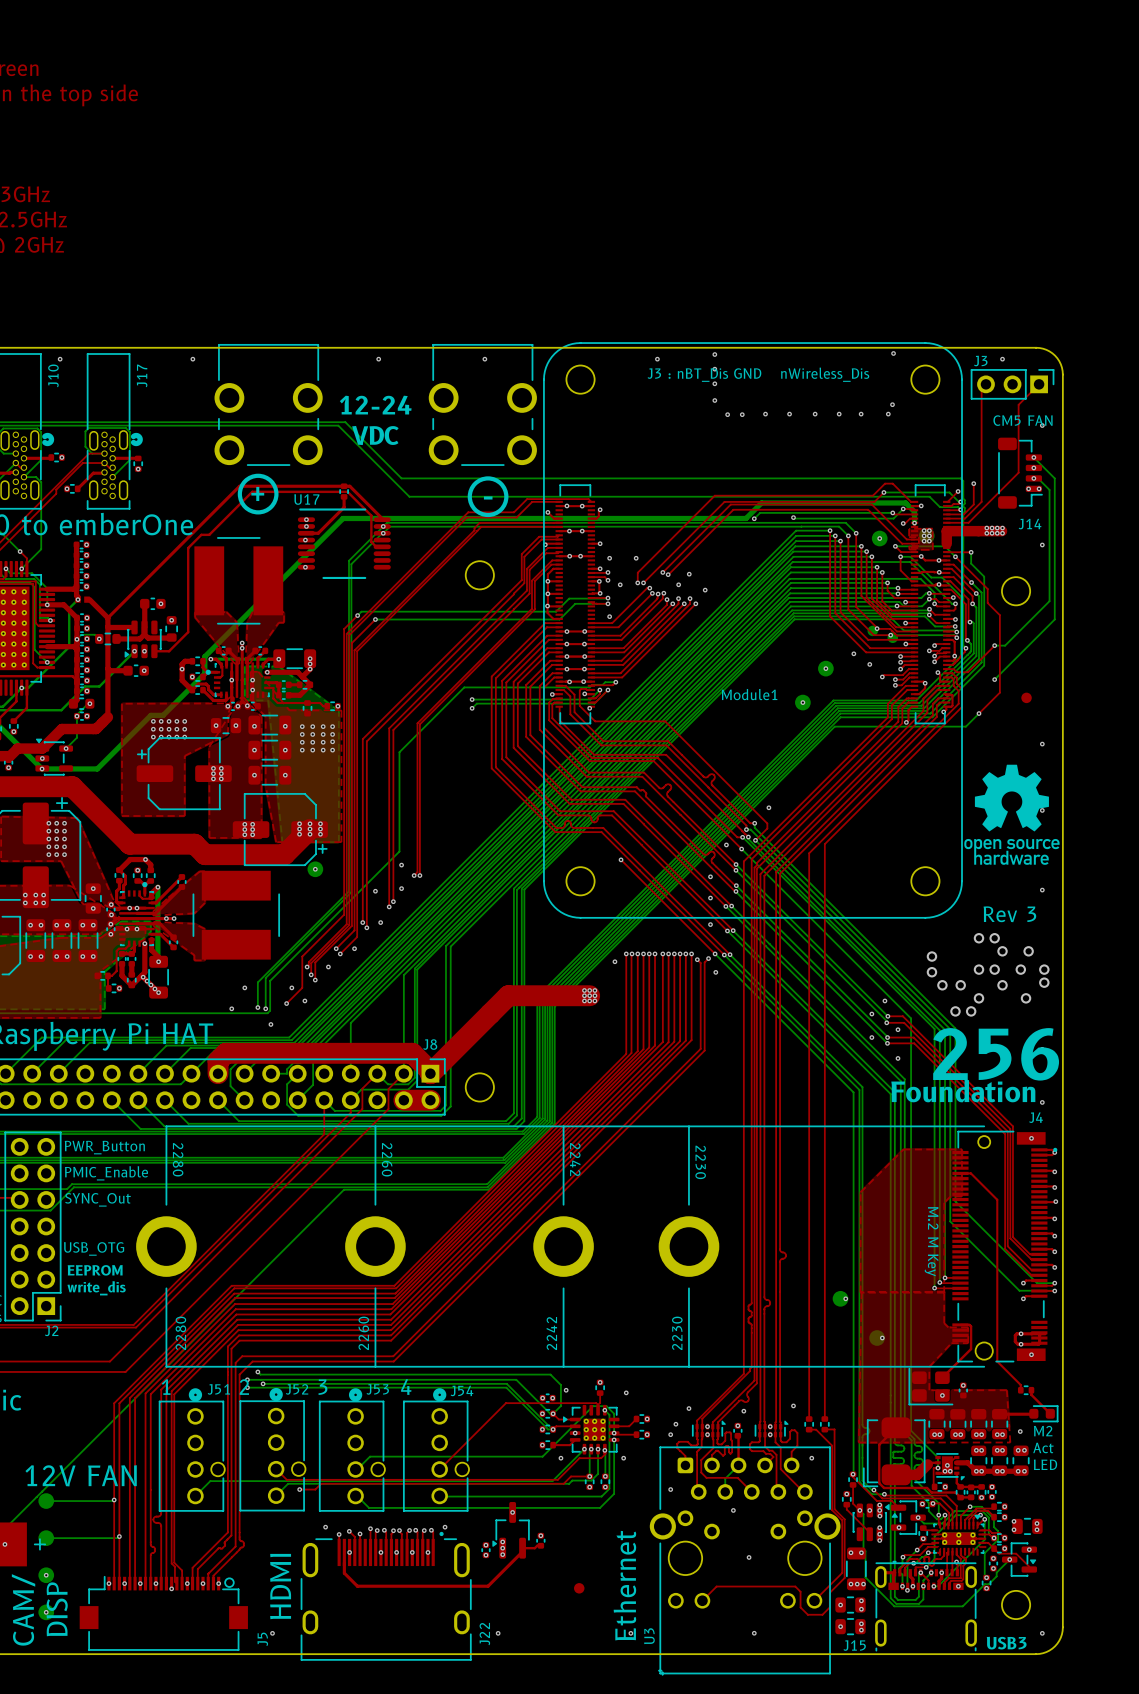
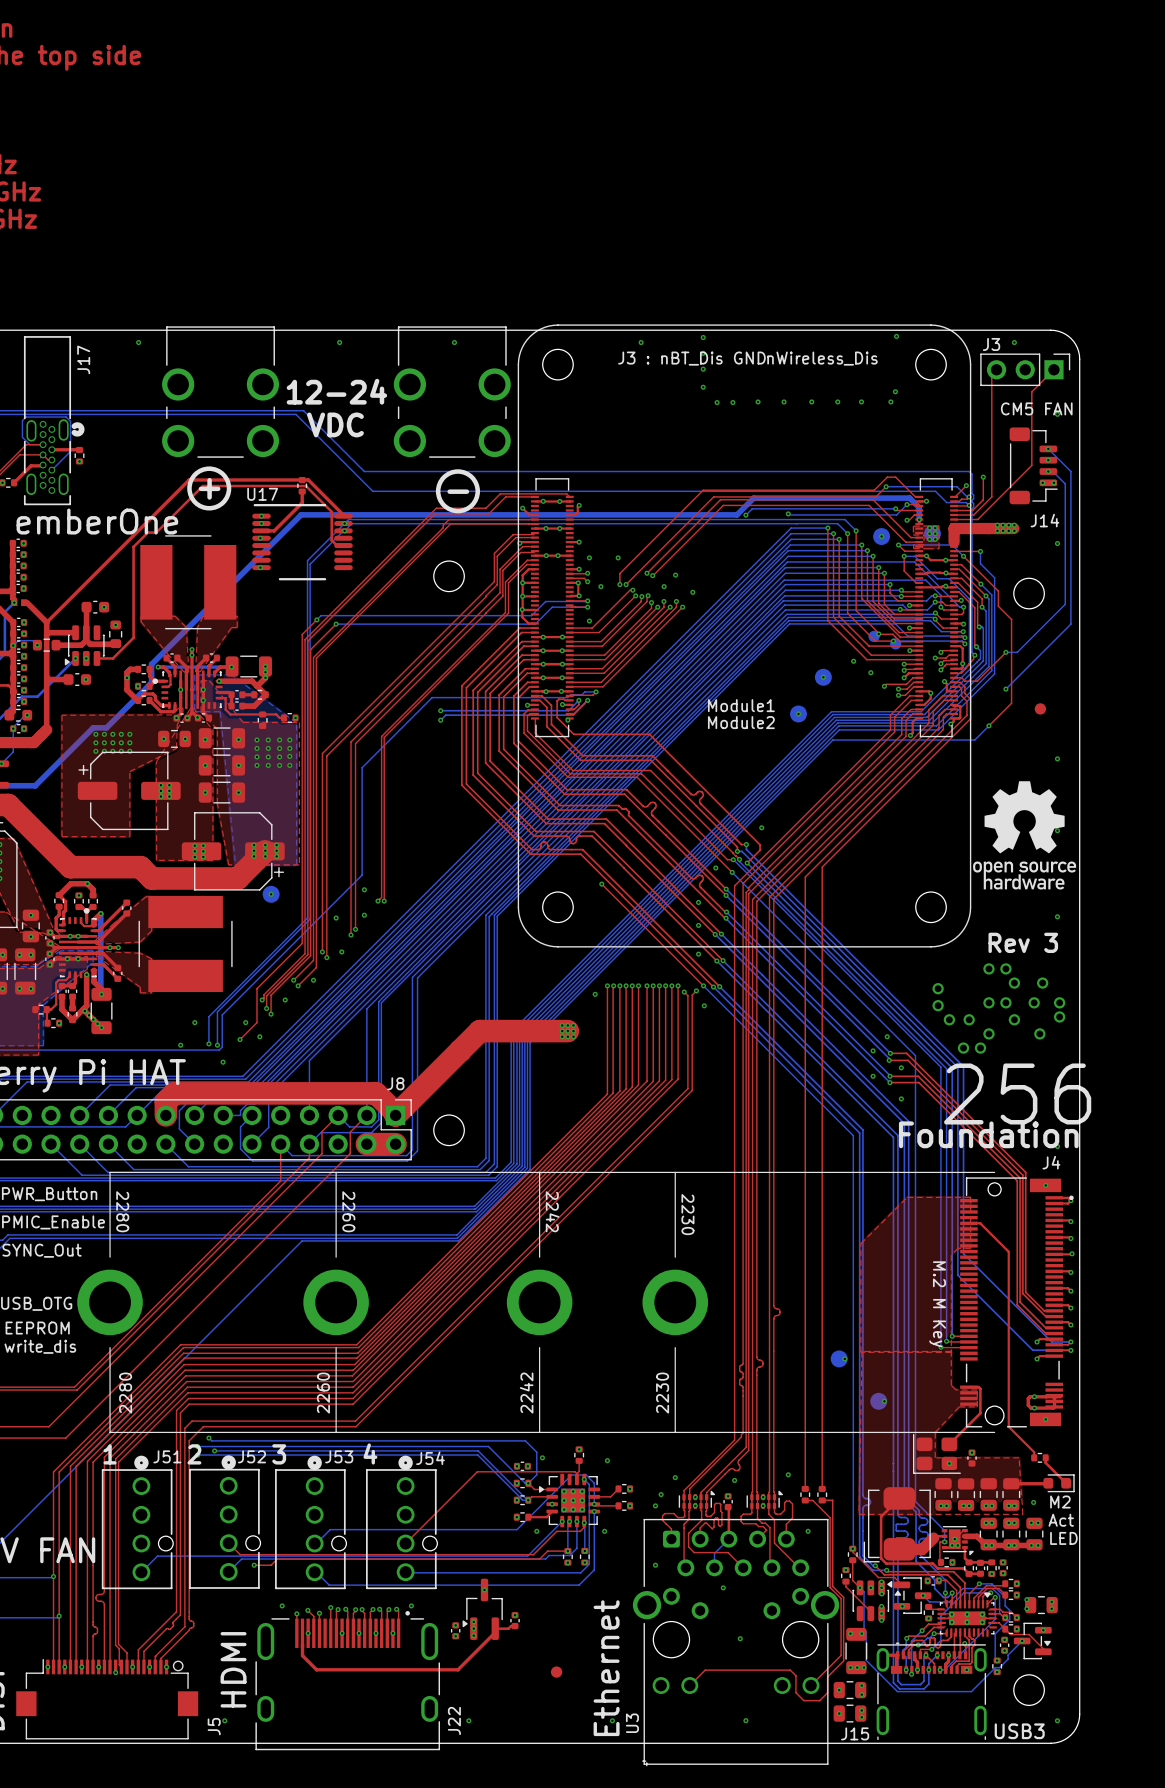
Module2: none -> (552, 607)

